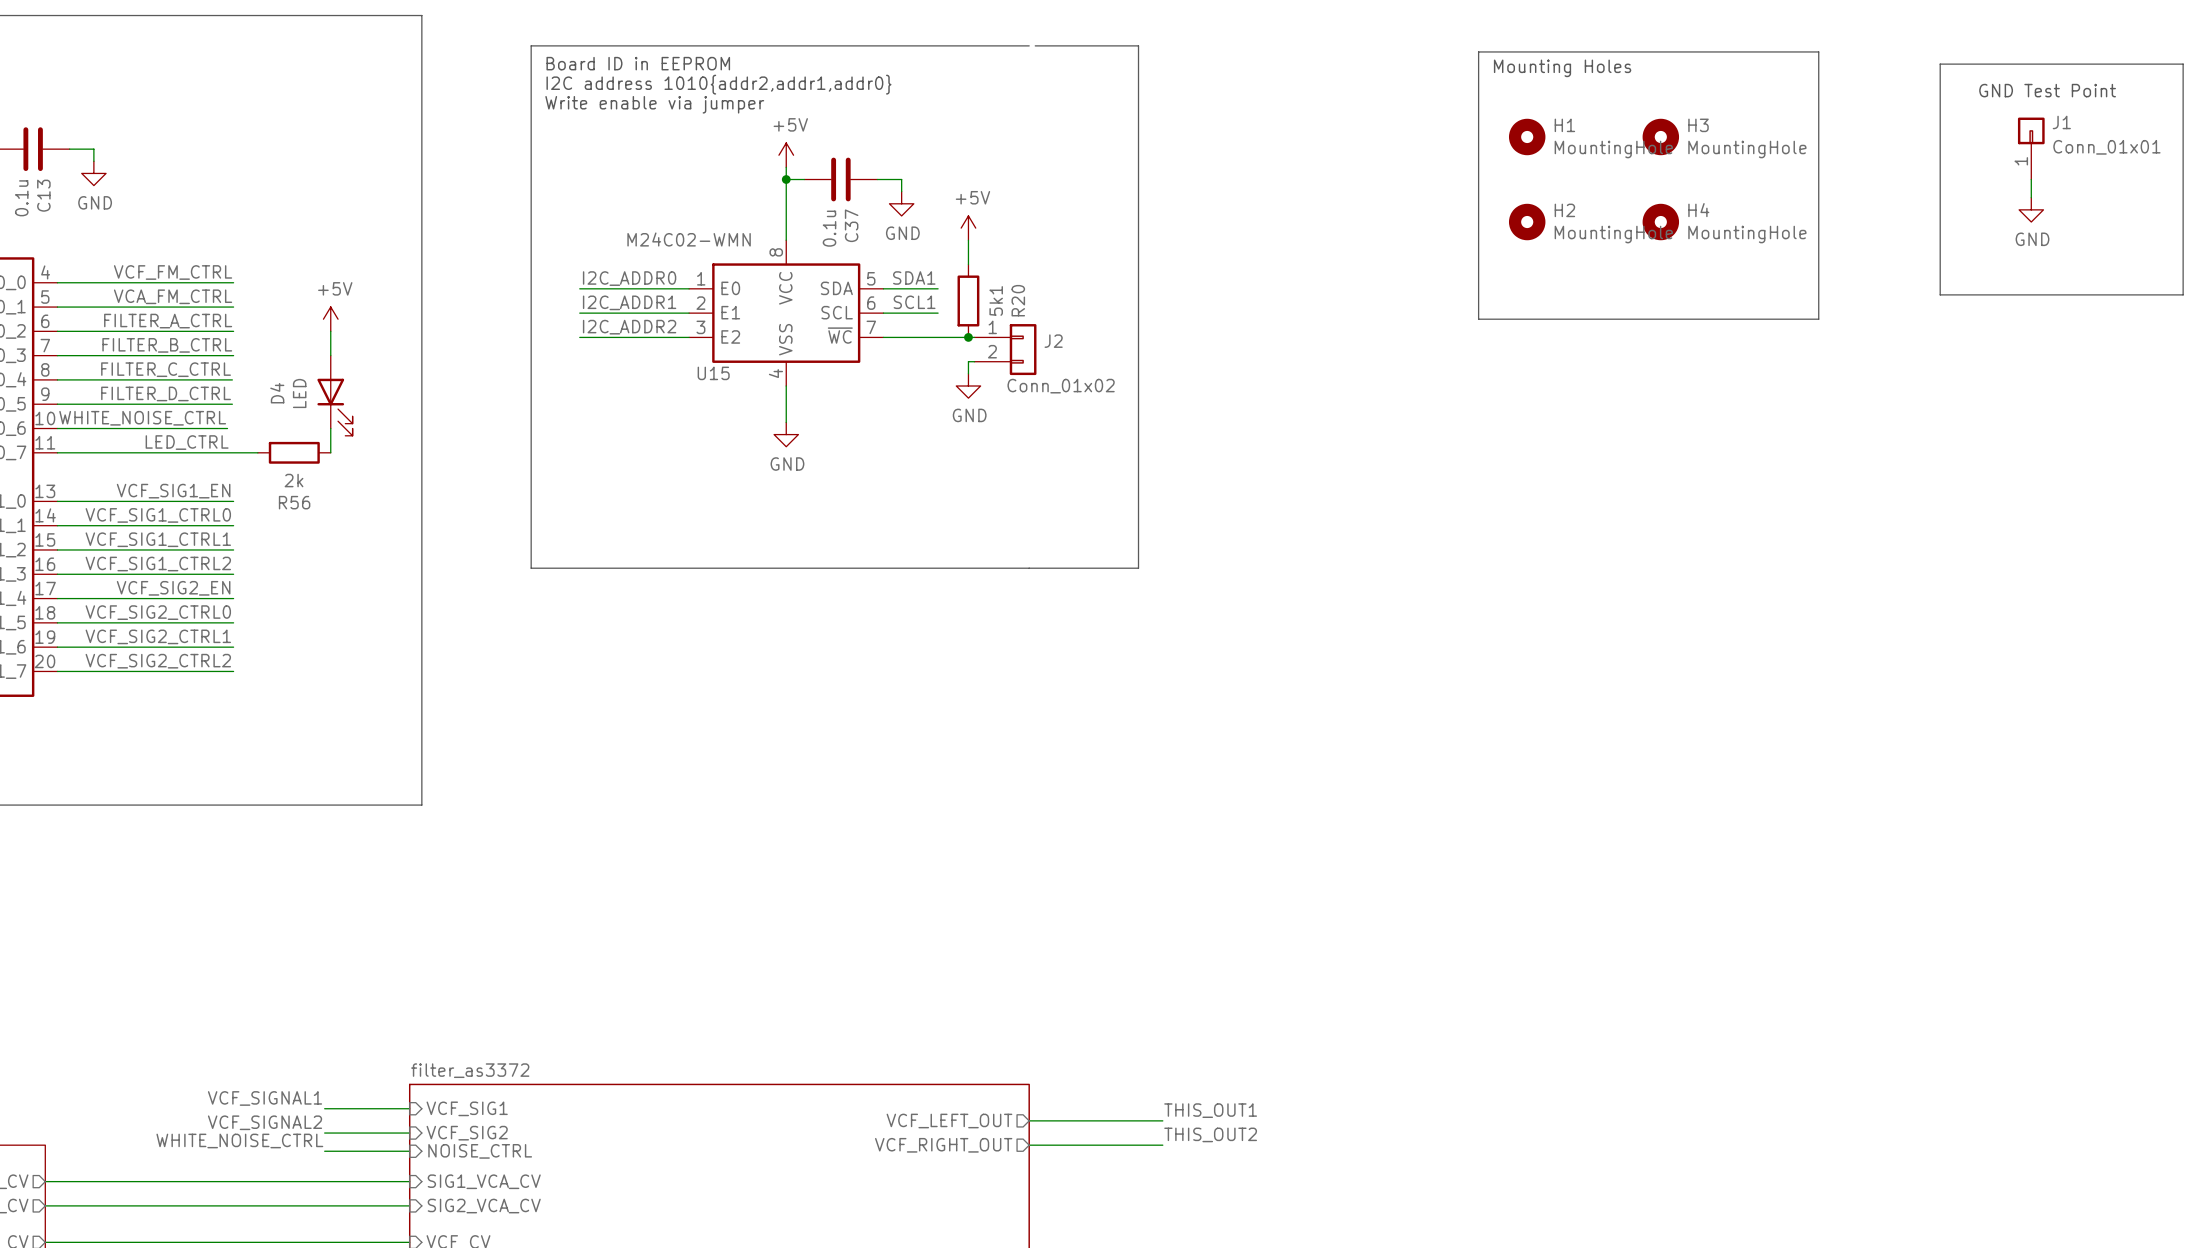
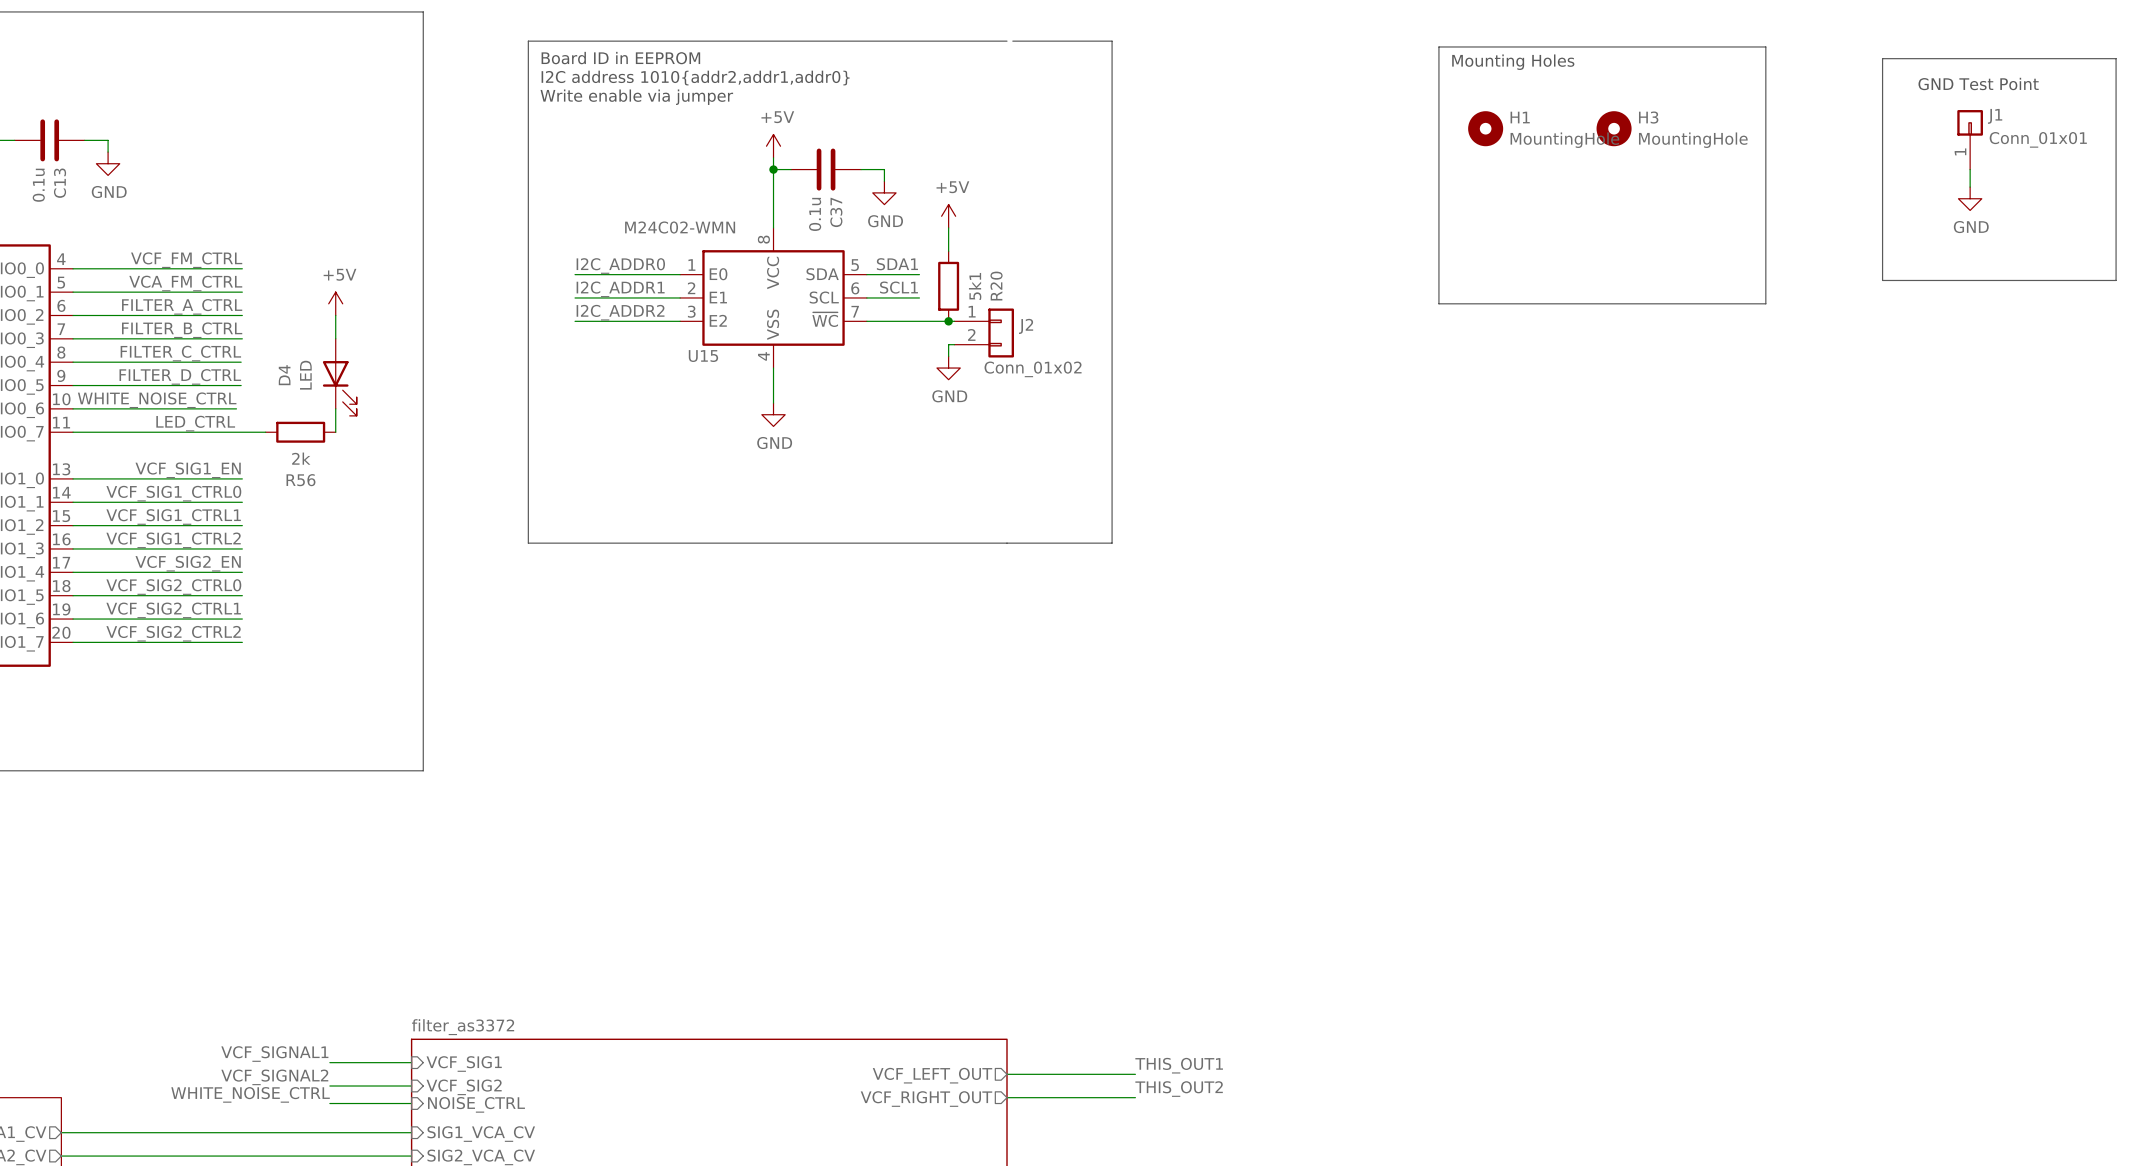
H2: MountingHole (1527, 222) -> none
H4: MountingHole (1660, 222) -> none

